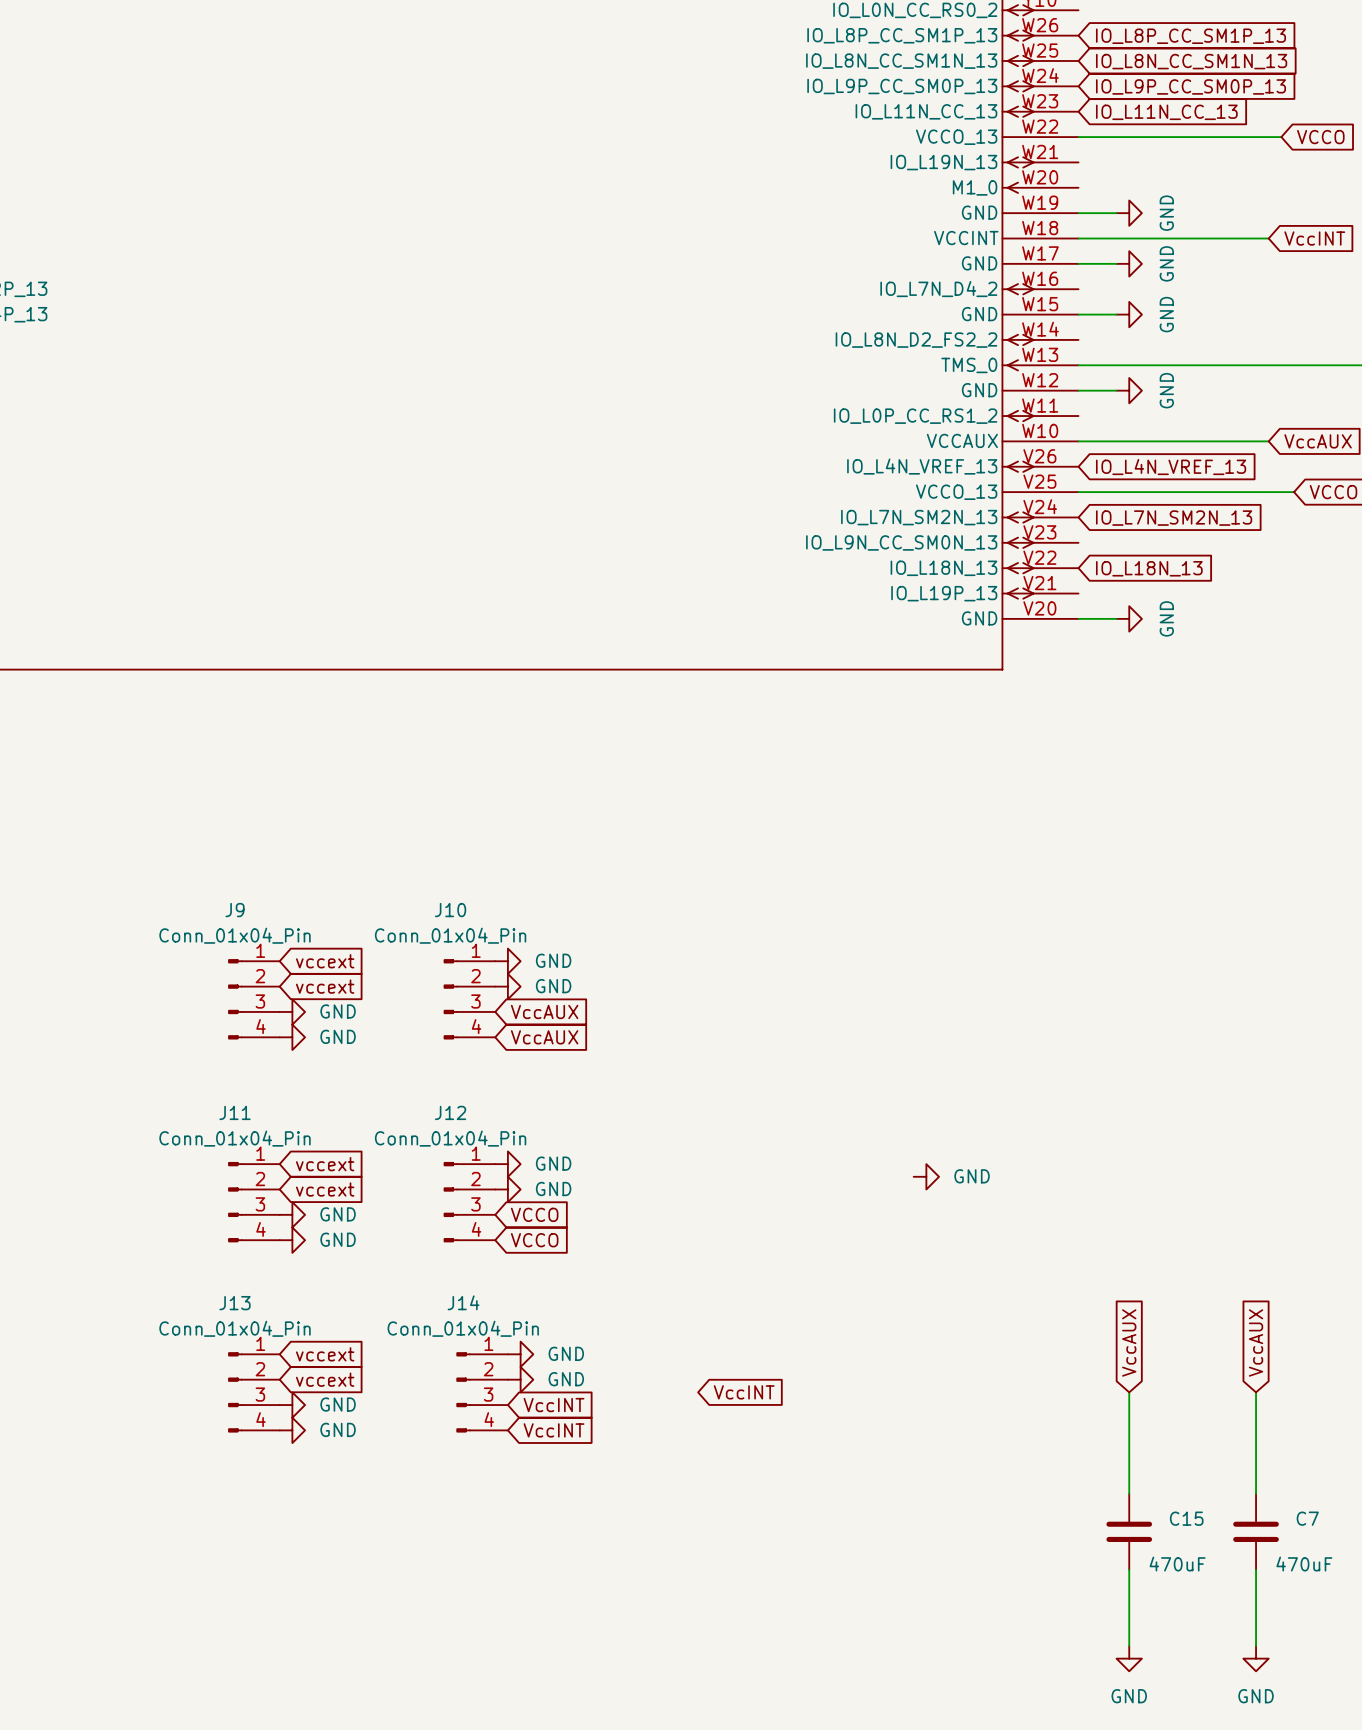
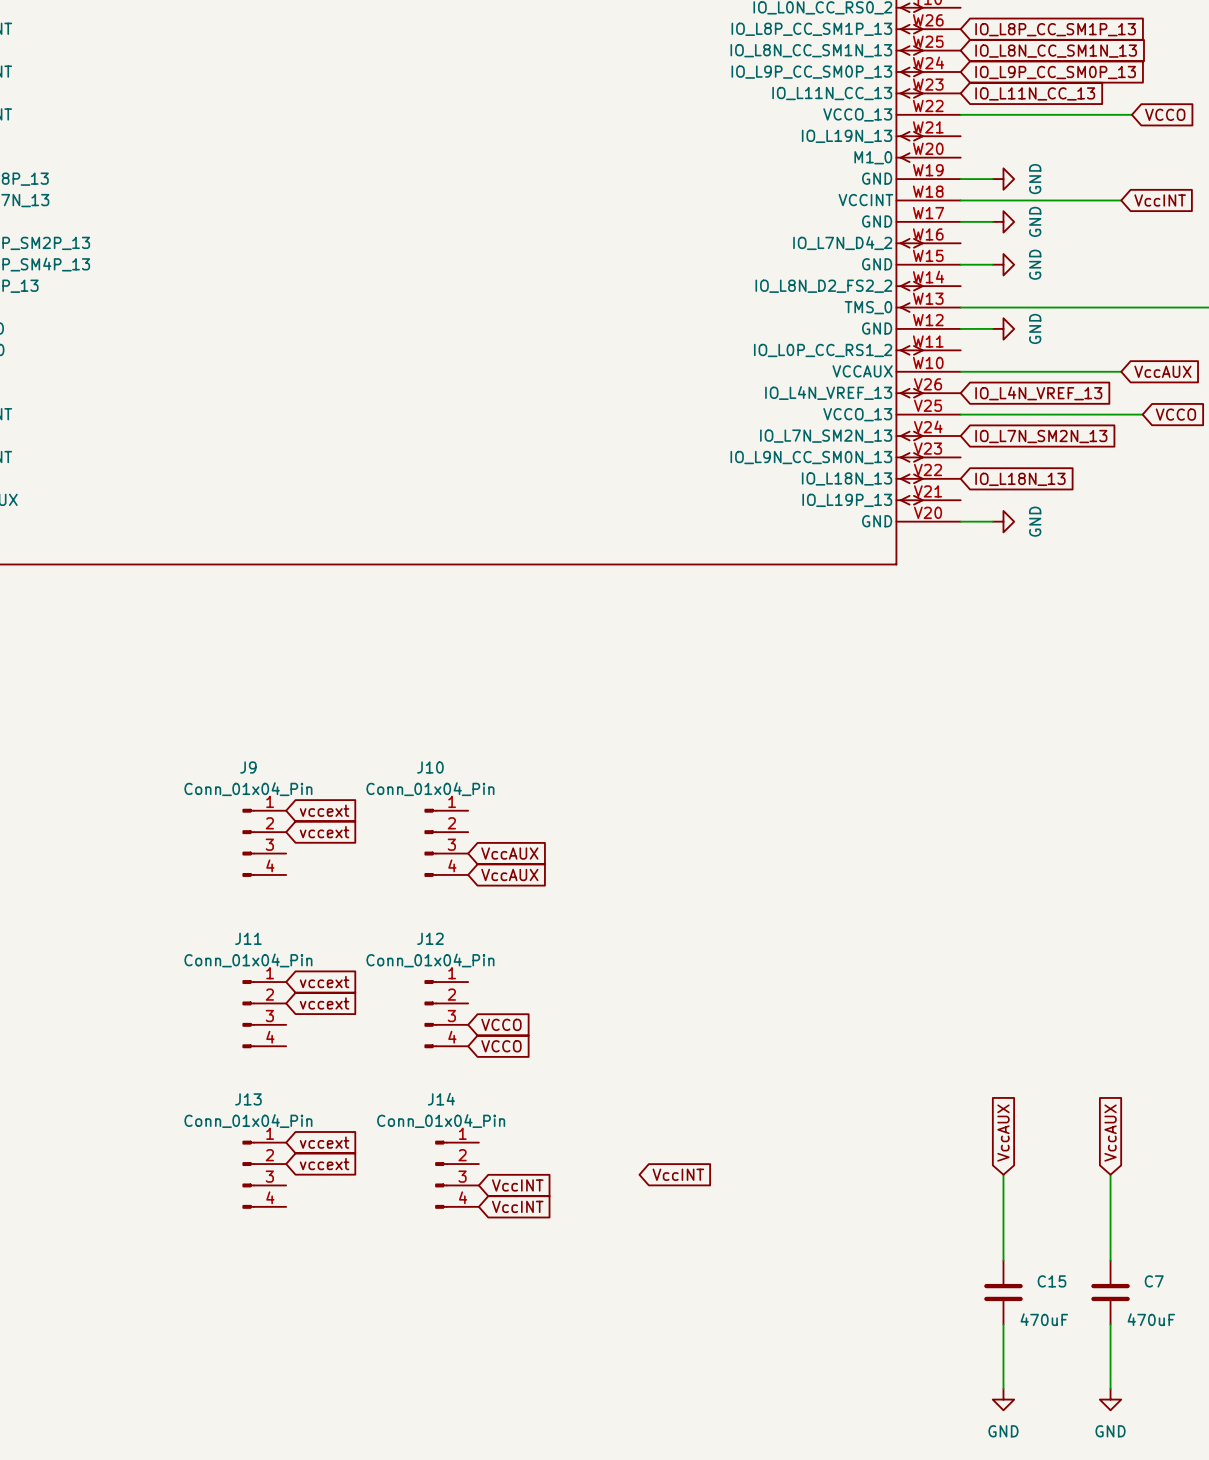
power symbol: GND (507, 961) -> none
power symbol: GND (507, 986) -> none
power symbol: GND (292, 1011) -> none
power symbol: GND (292, 1037) -> none
power symbol: GND (507, 1164) -> none
power symbol: GND (926, 1176) -> none
power symbol: GND (507, 1189) -> none
power symbol: GND (292, 1214) -> none
power symbol: GND (292, 1240) -> none
power symbol: GND (520, 1354) -> none
power symbol: GND (520, 1379) -> none
power symbol: GND (292, 1405) -> none
power symbol: GND (292, 1430) -> none

